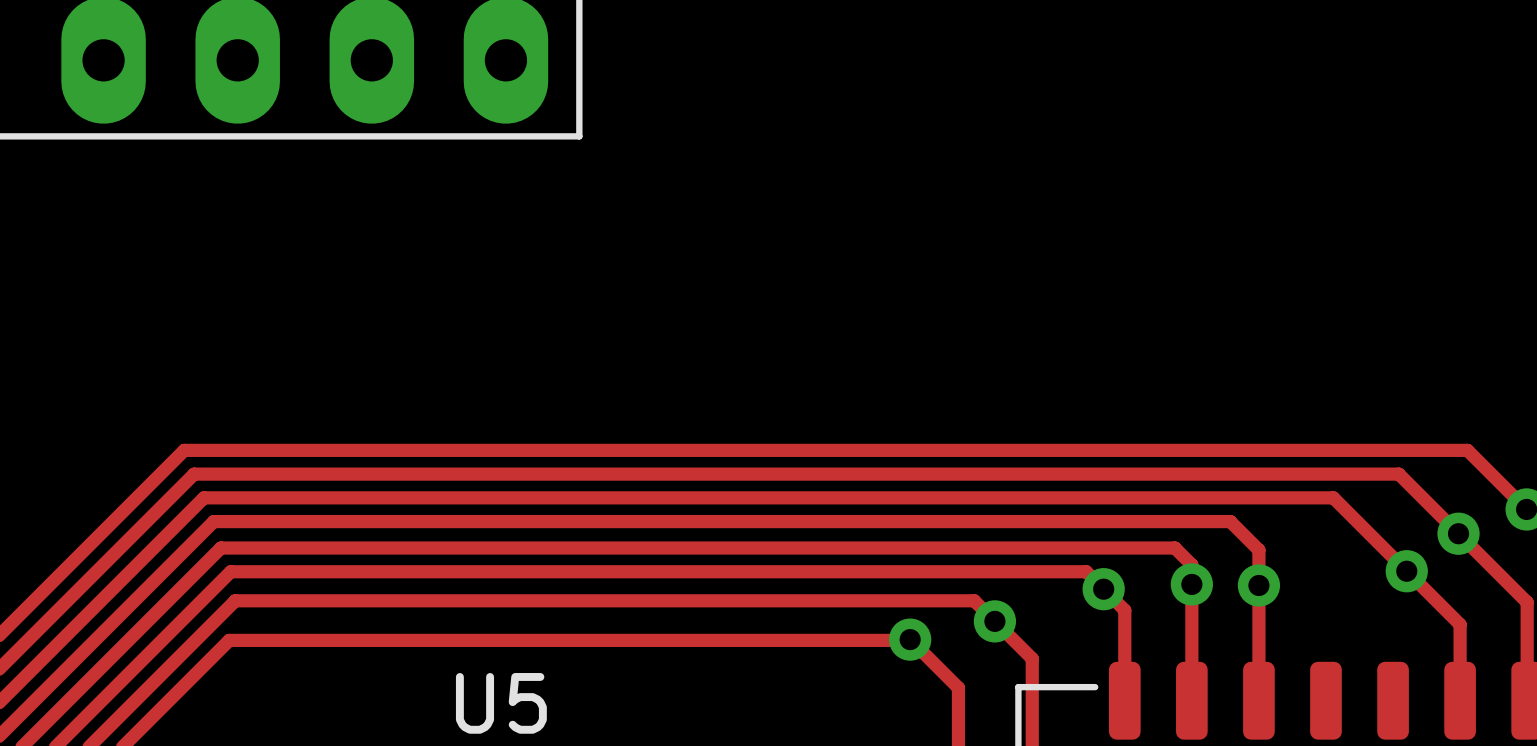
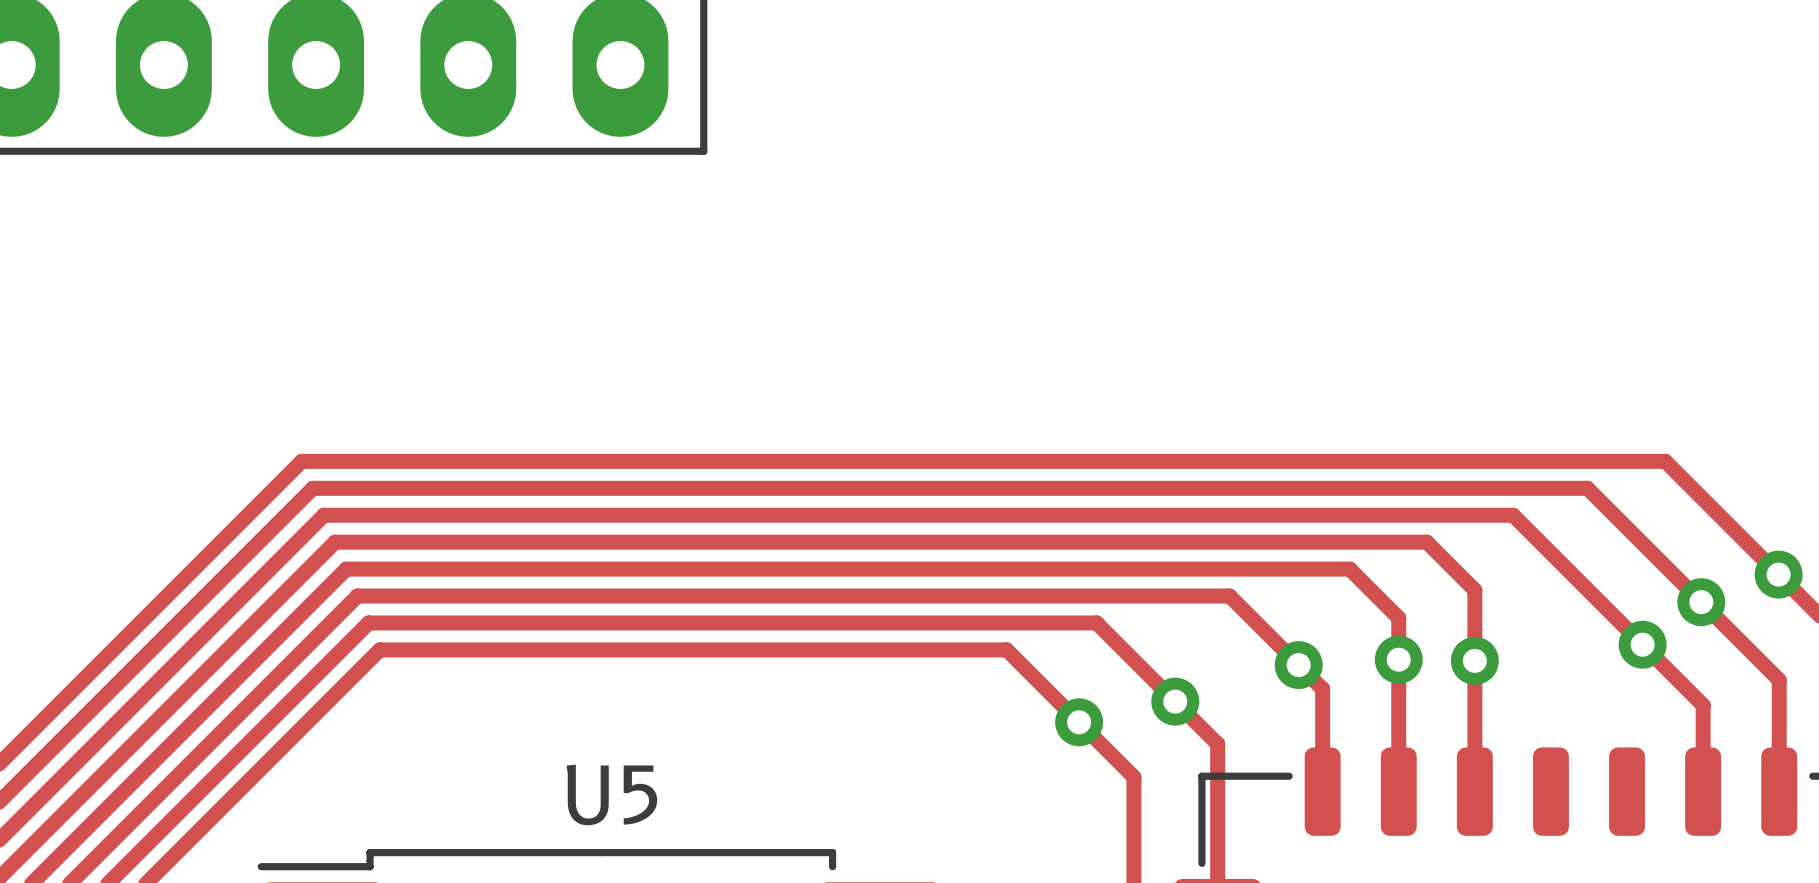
track: (184, 450) (1467, 450) -> (255, 507) (301, 461) (1665, 461) (1711, 507)
track: (194, 474) (1398, 474) -> (266, 534) (312, 488) (1587, 488) (1633, 534)
track: (203, 497) (1333, 497) -> (277, 561) (324, 515) (1513, 515) (1559, 561)
track: (213, 521) (1230, 521) (1258, 550) -> (288, 588) (335, 542) (1426, 542) (1474, 590) (1474, 620)
track: (220, 548) (1174, 548) (1191, 564) -> (297, 618) (346, 569) (1349, 569) (1398, 618) (1398, 637)
track: (230, 571) (1086, 571) -> (308, 645) (357, 596) (1229, 596) (1278, 645)
track: (235, 600) (974, 600) -> (313, 678) (368, 622) (1096, 622) (1151, 678)
track: (910, 639) (229, 640) -> (1079, 722) (1006, 649) (379, 649) (306, 723)

